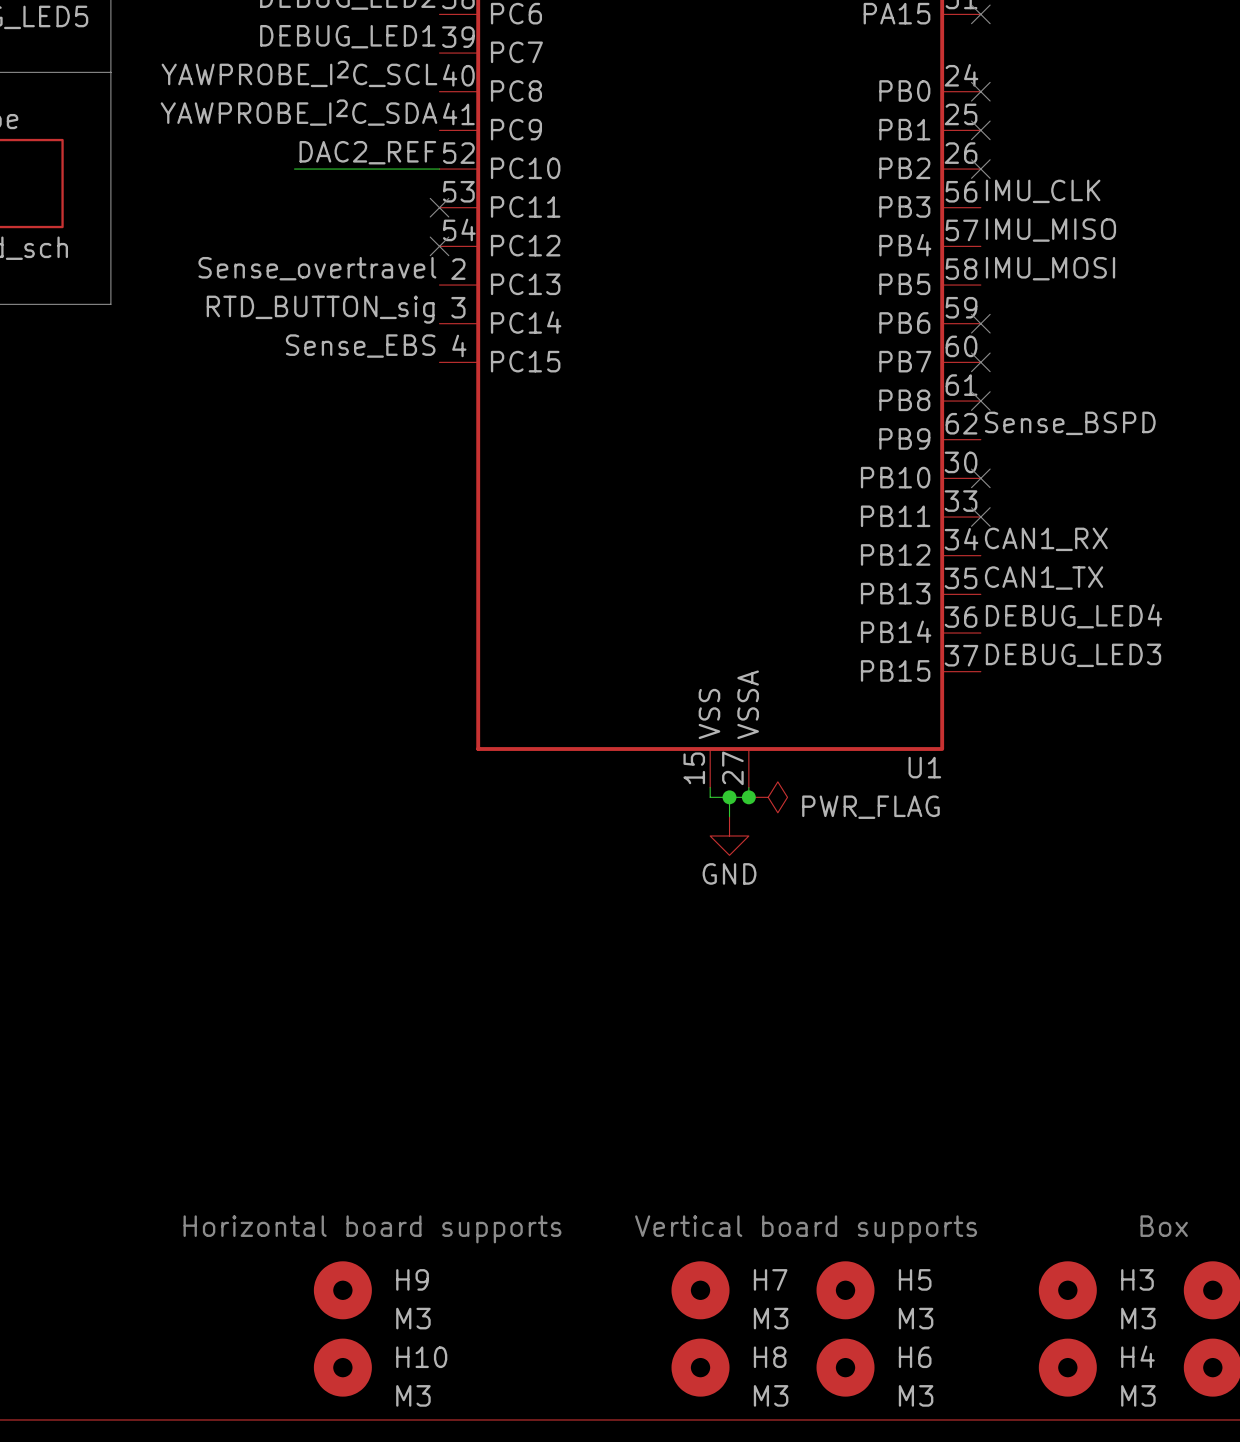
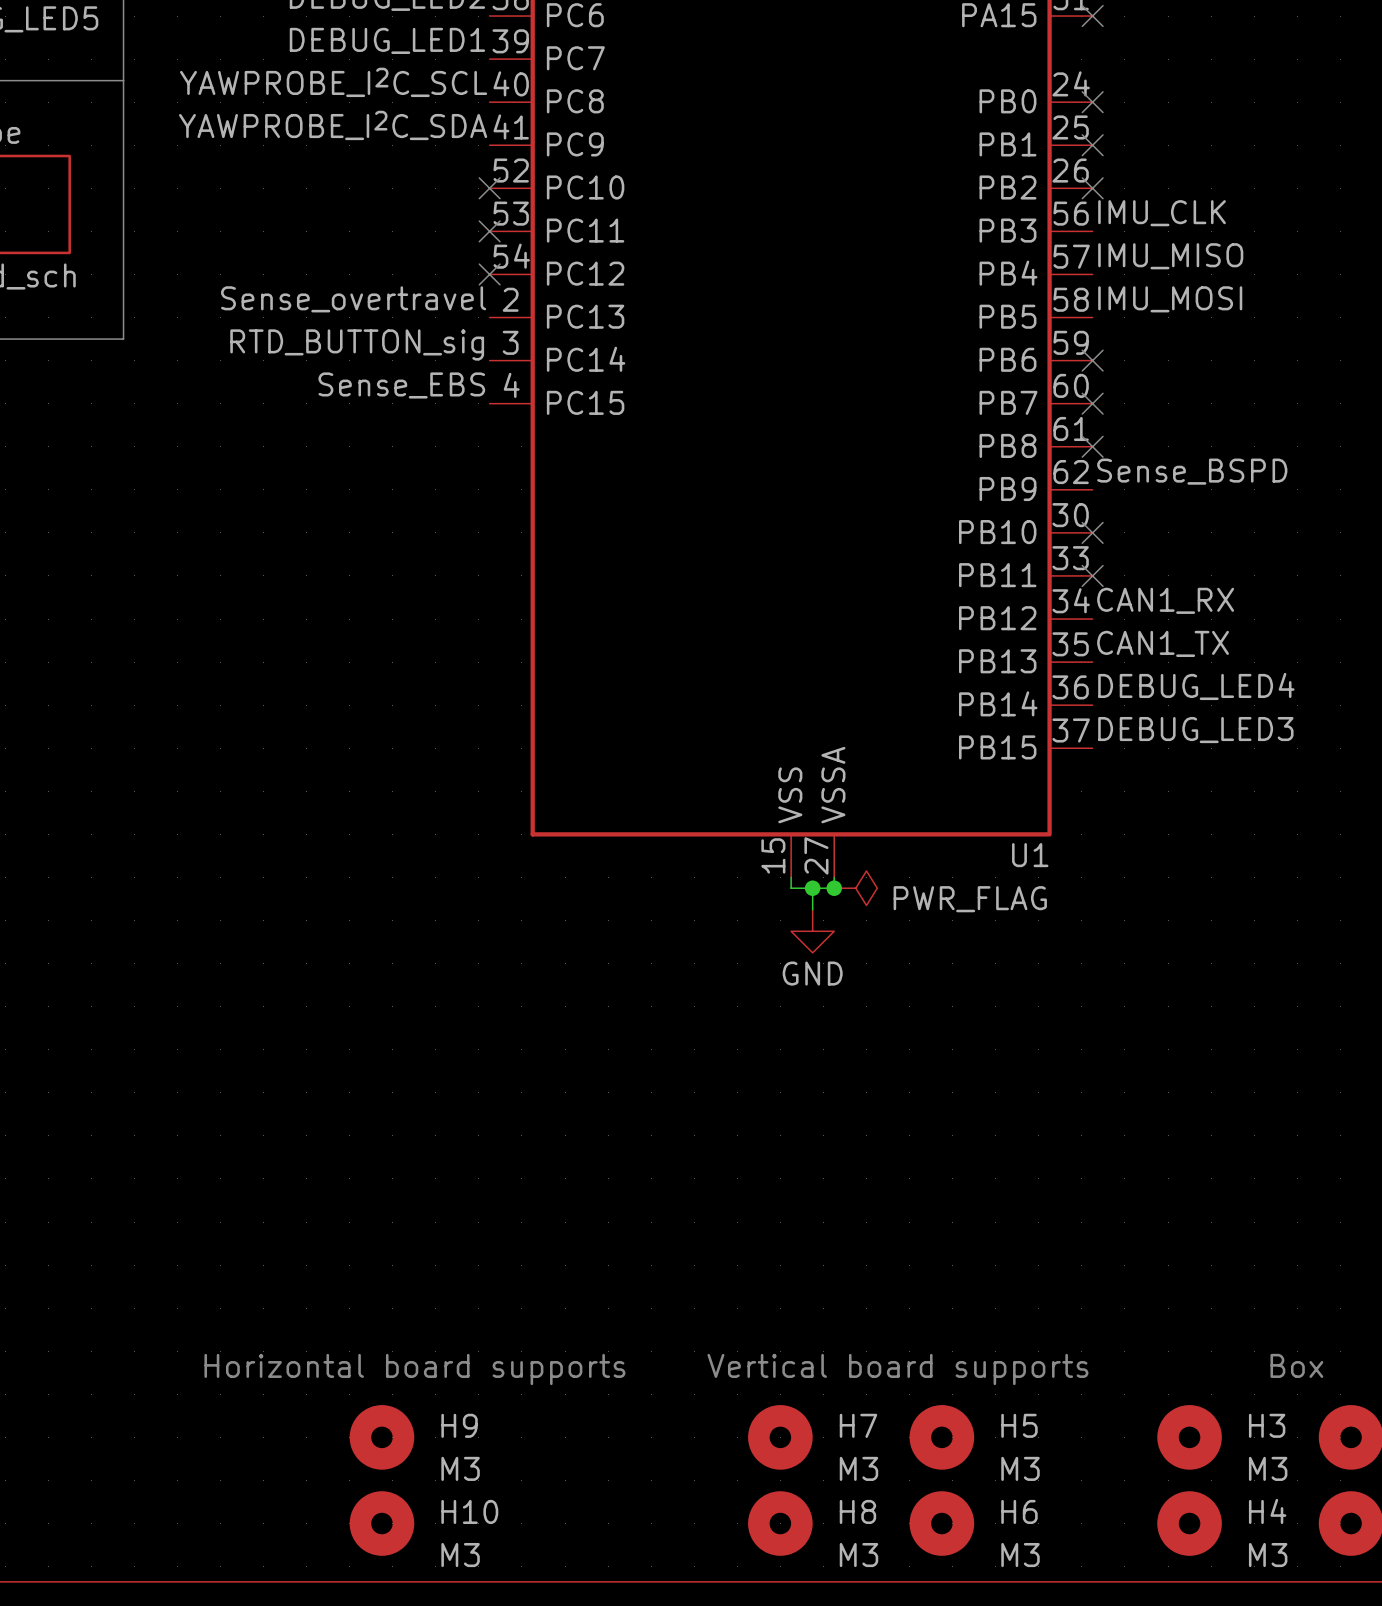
label: DAC2_REF (367, 152) -> none
wire: (294, 169) (439, 169) -> none
no-connect mark: none -> (489, 188)

